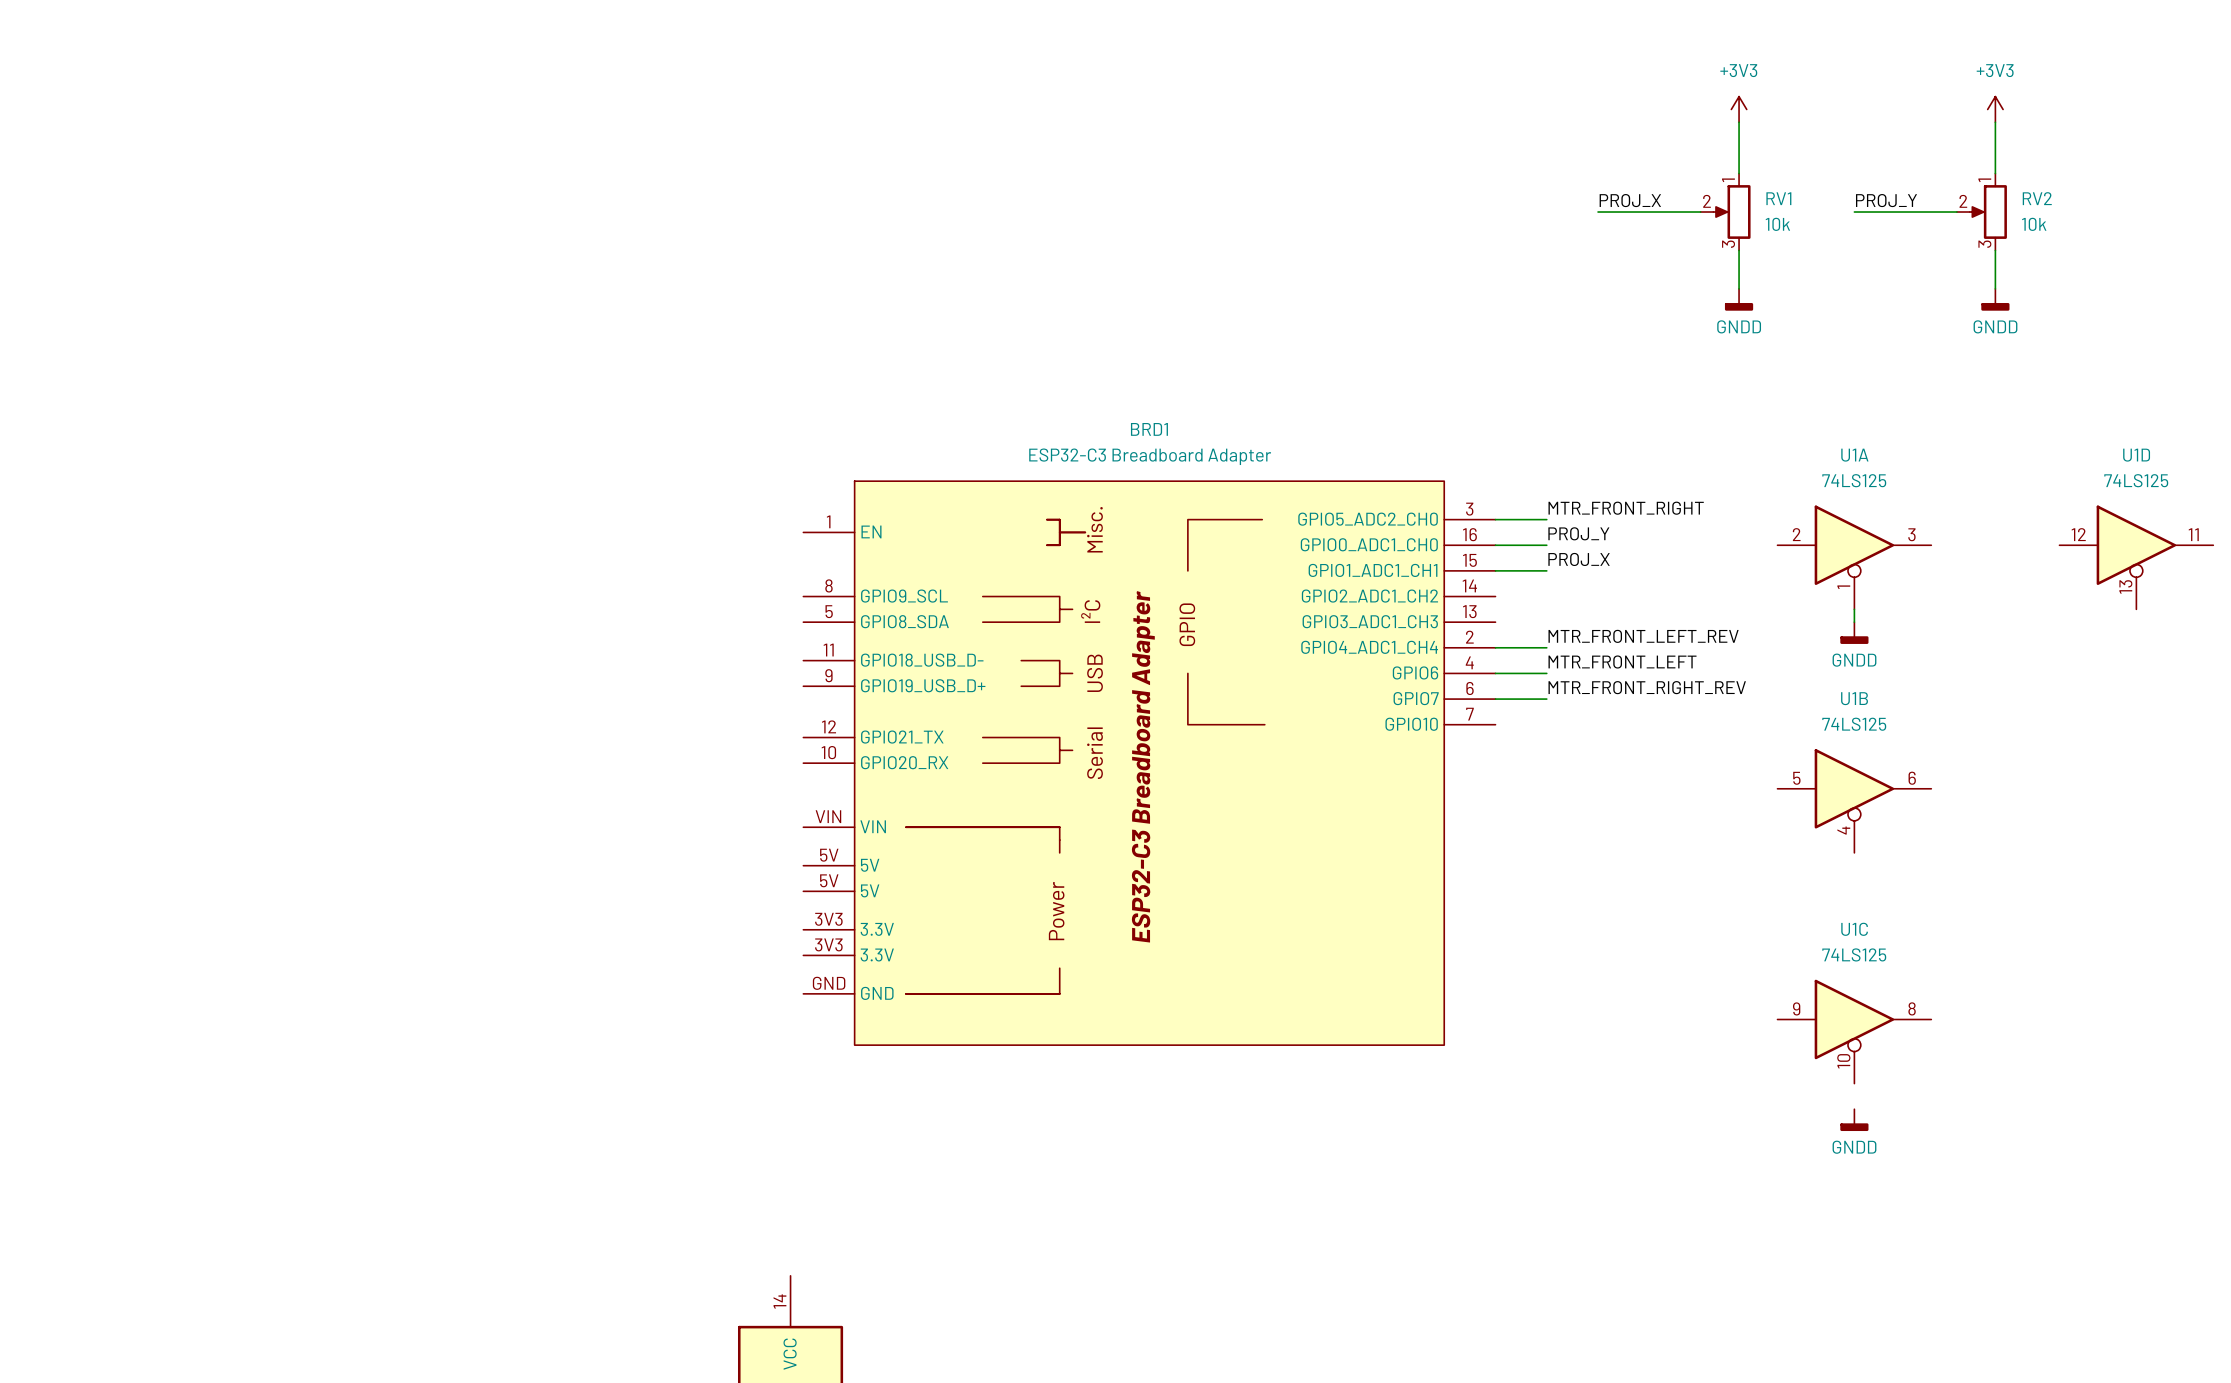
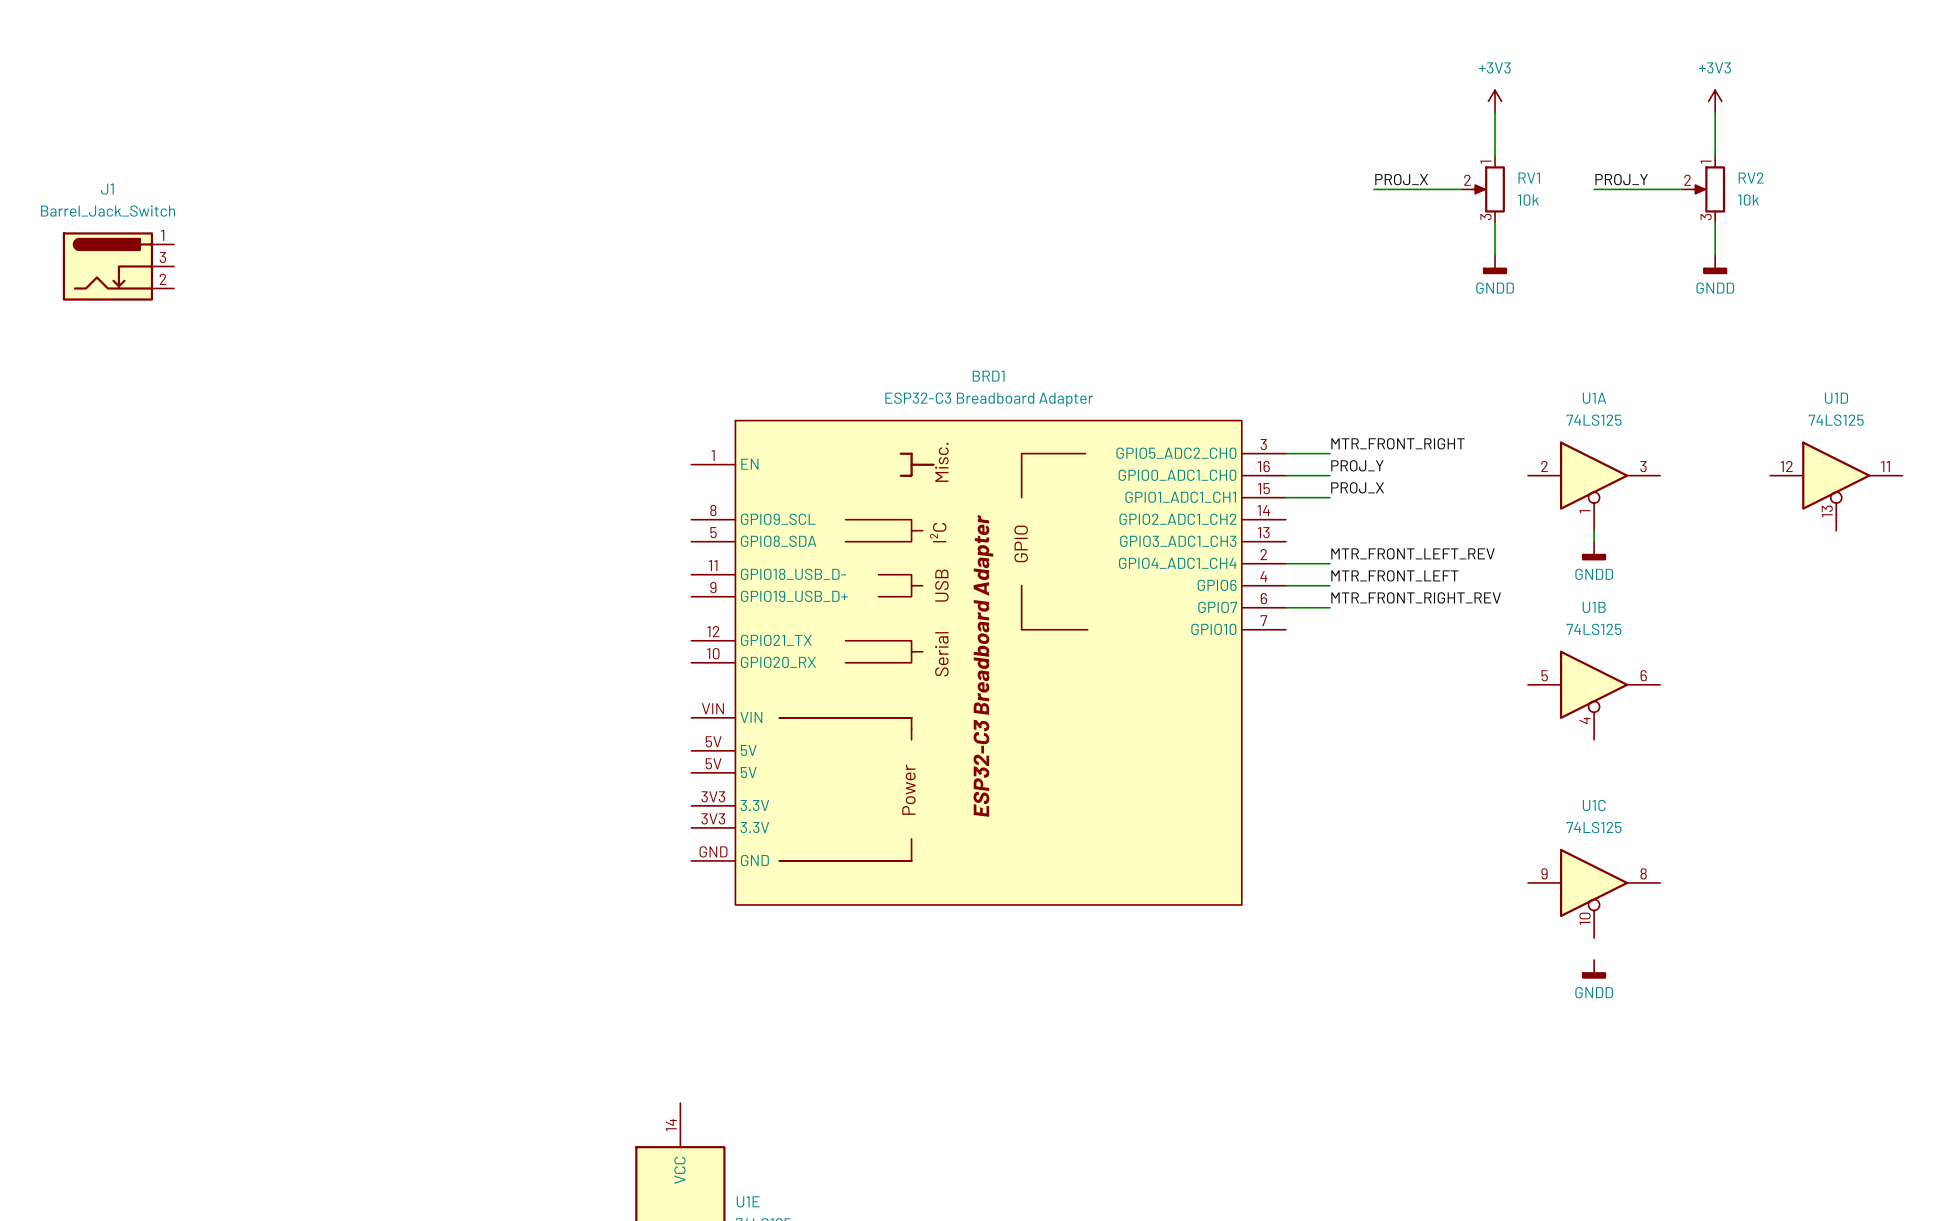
J1: none -> Barrel_Jack_Switch (118, 266)

